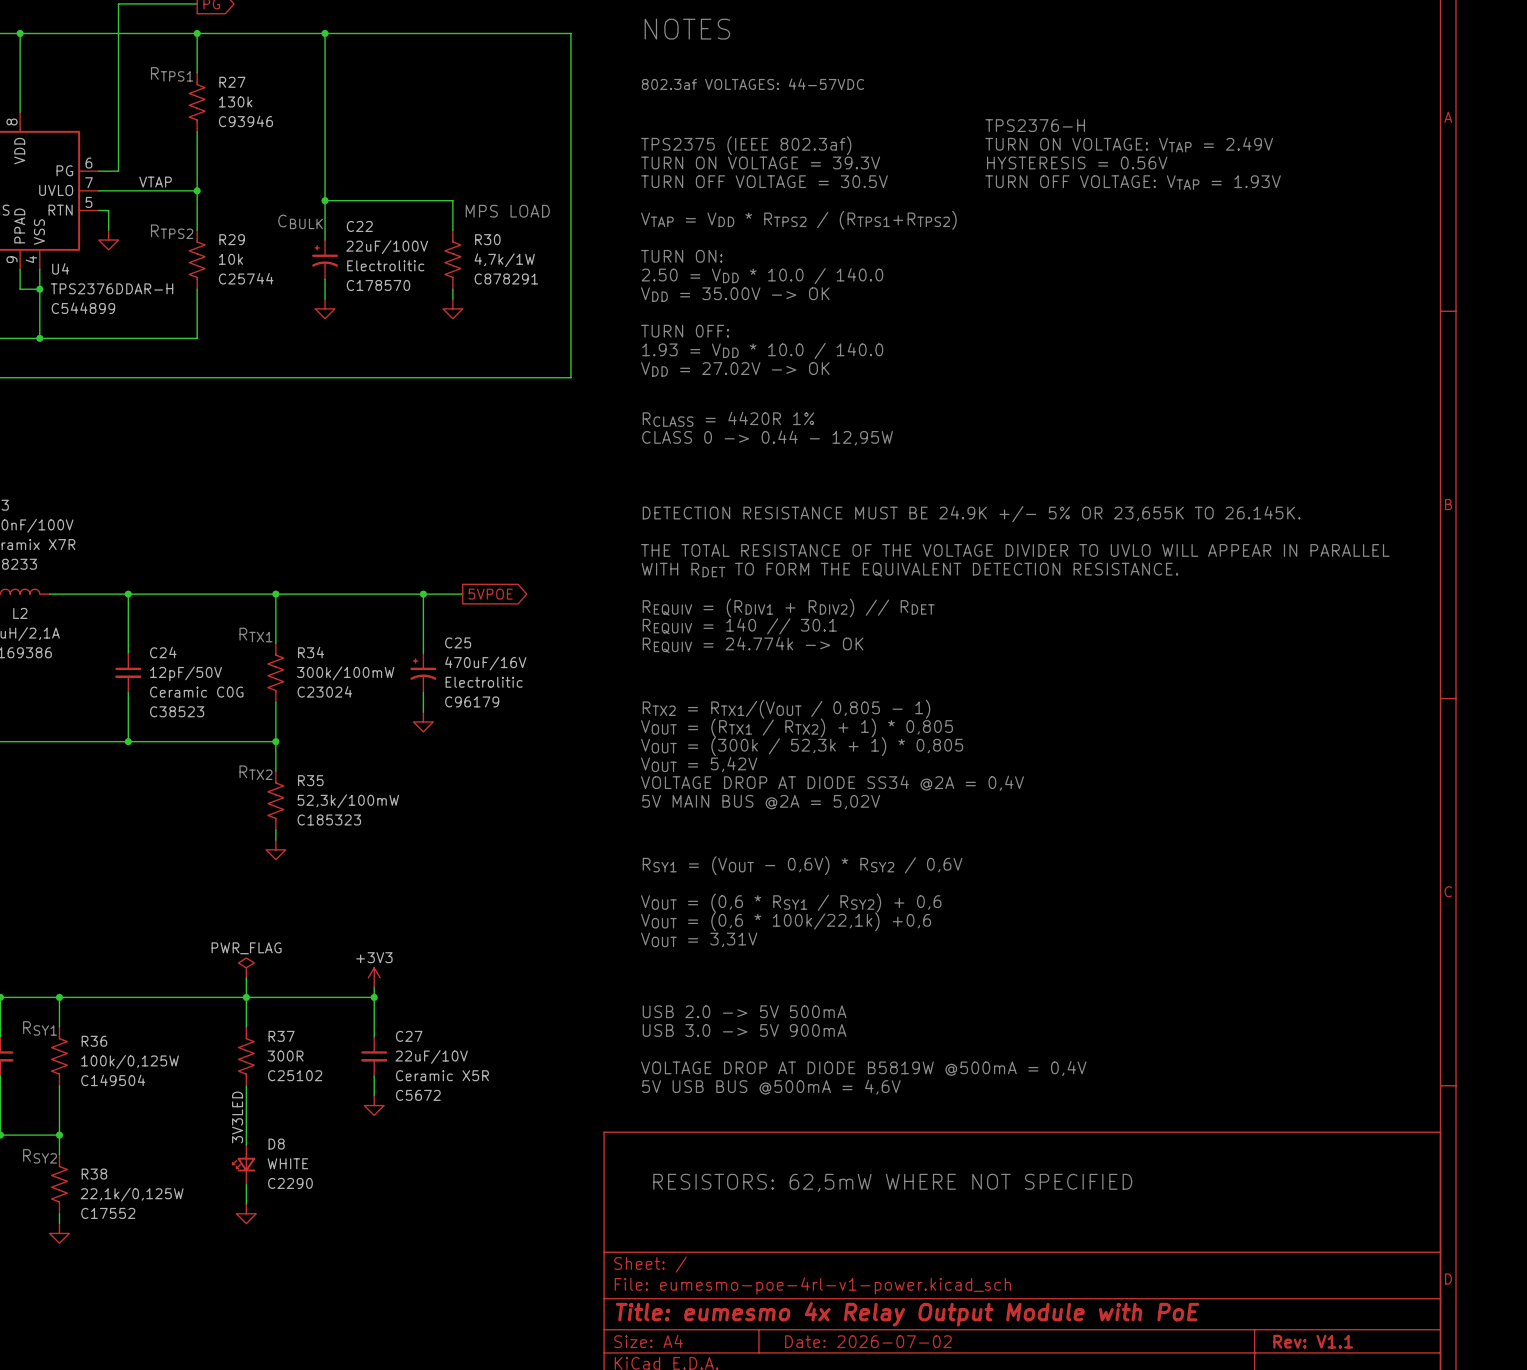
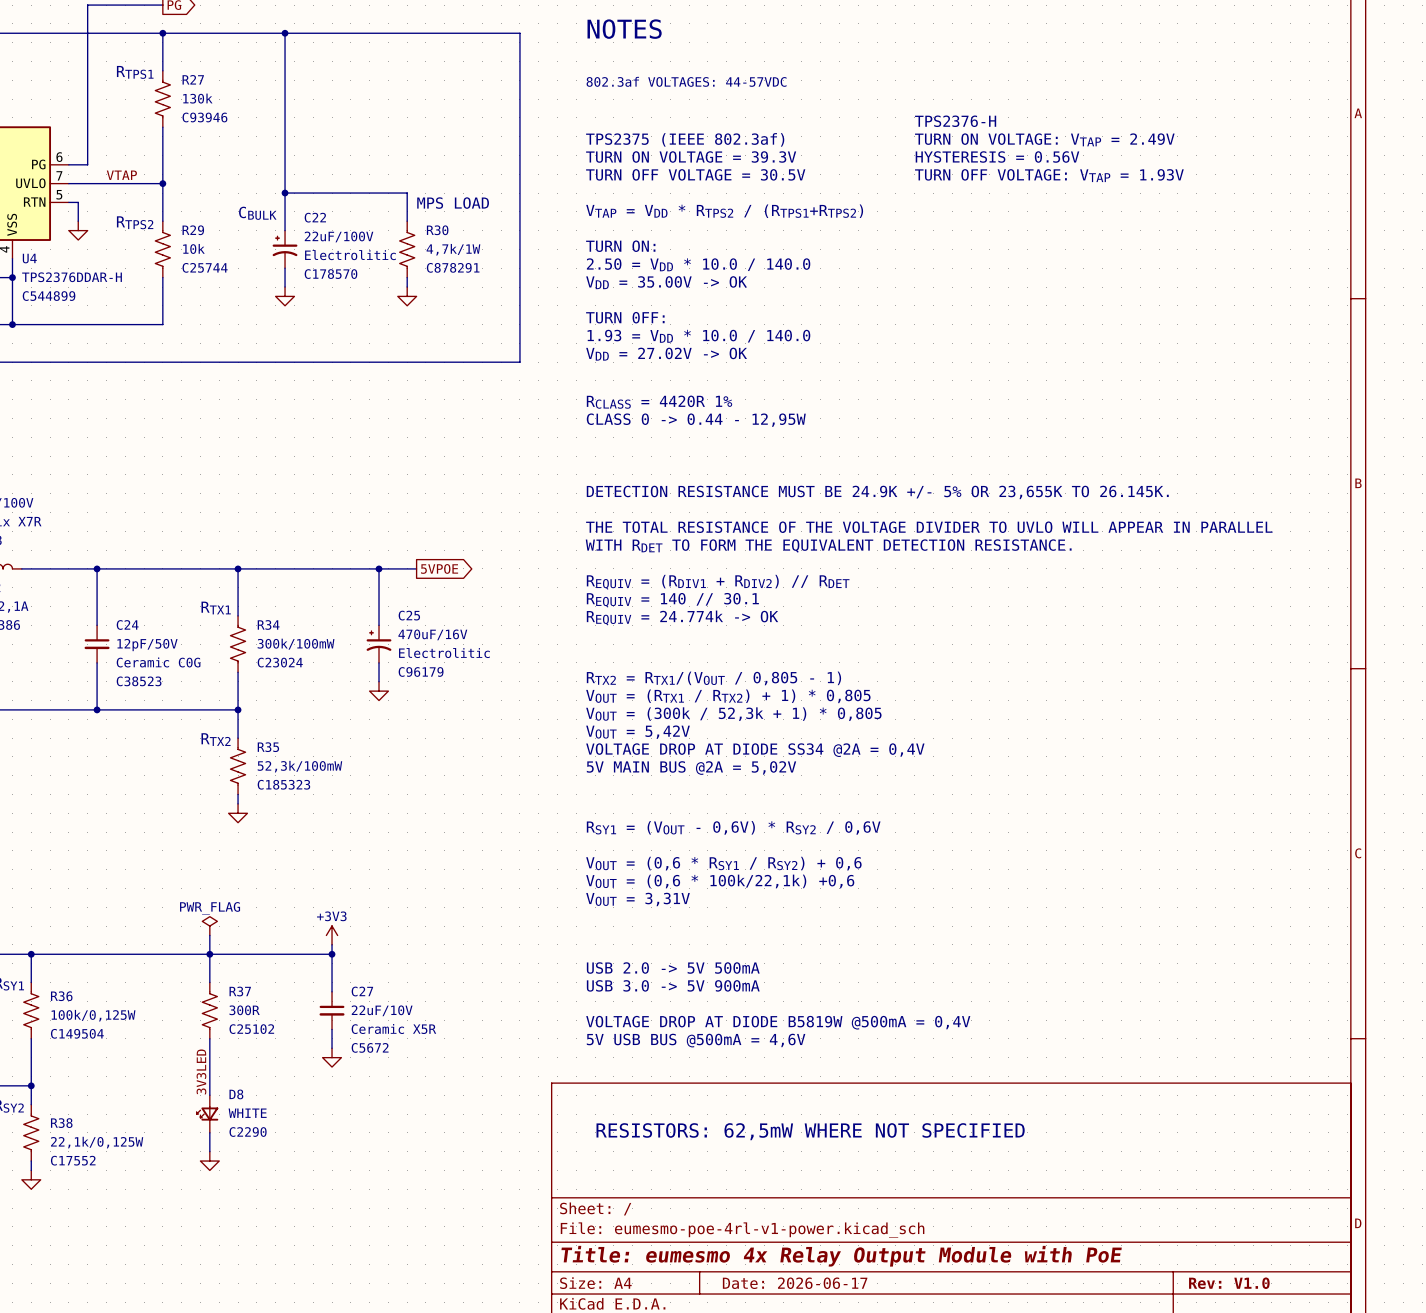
title block: Date: 2026-07-02 (868, 1341) -> Date: 2026-06-17 (795, 1283)
title block: Rev: V1.1 (1313, 1341) -> Rev: V1.0 (1229, 1283)

